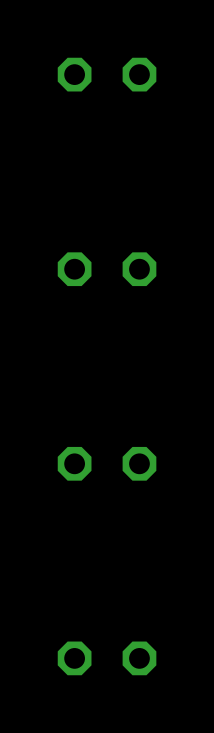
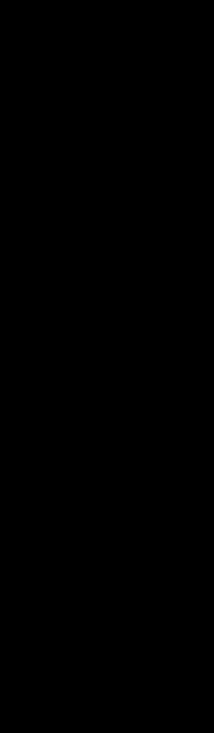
part: (107, 74) -> none
part: (107, 269) -> none
part: (107, 463) -> none
part: (107, 658) -> none

